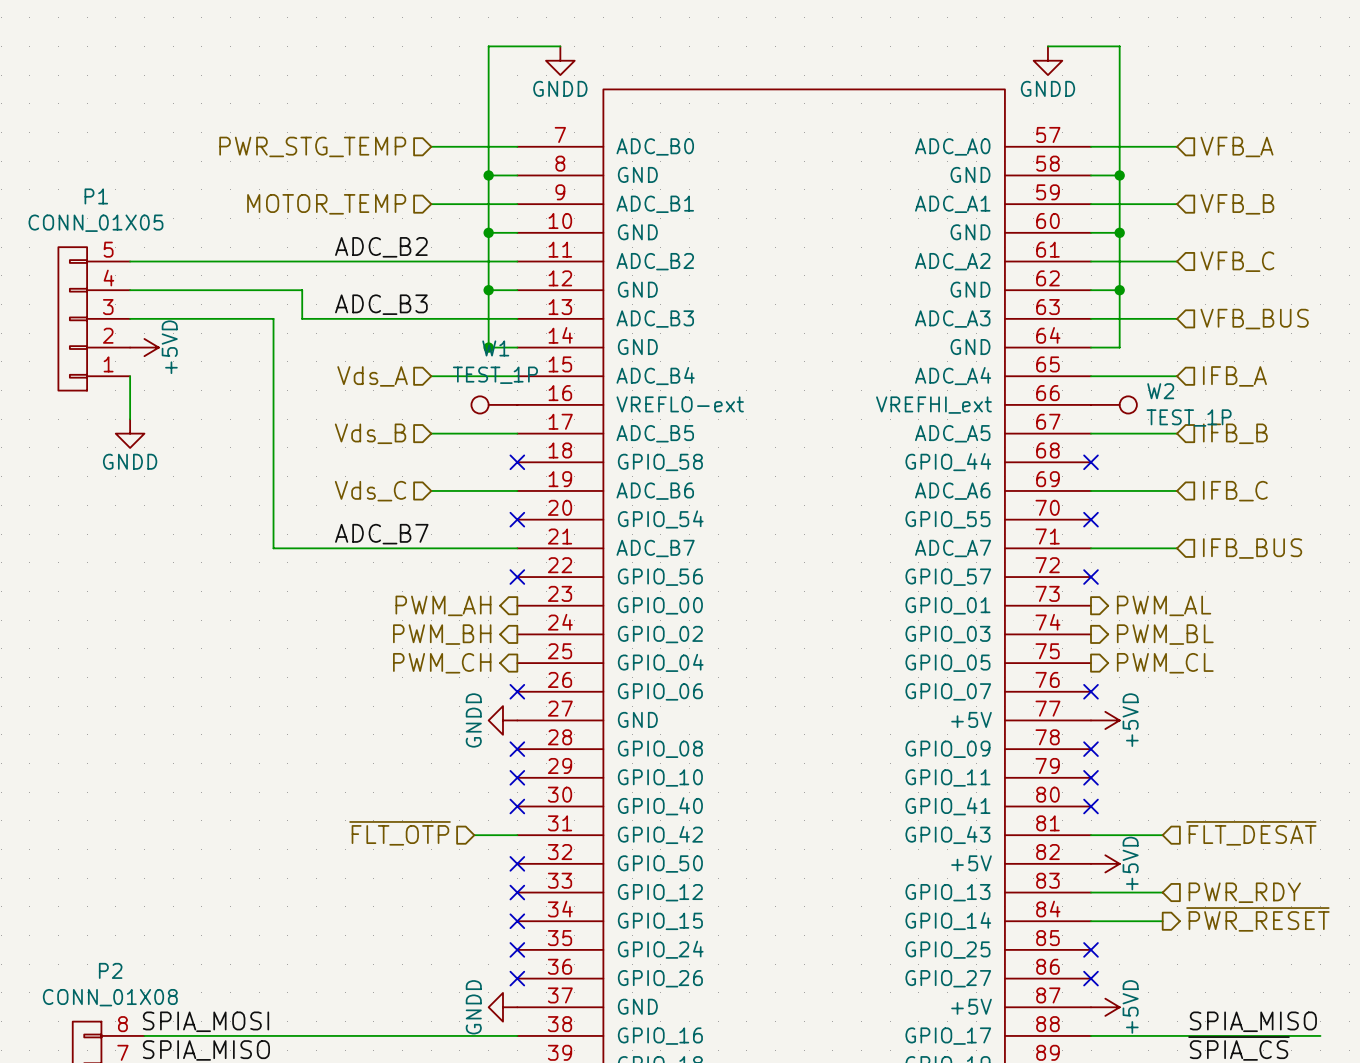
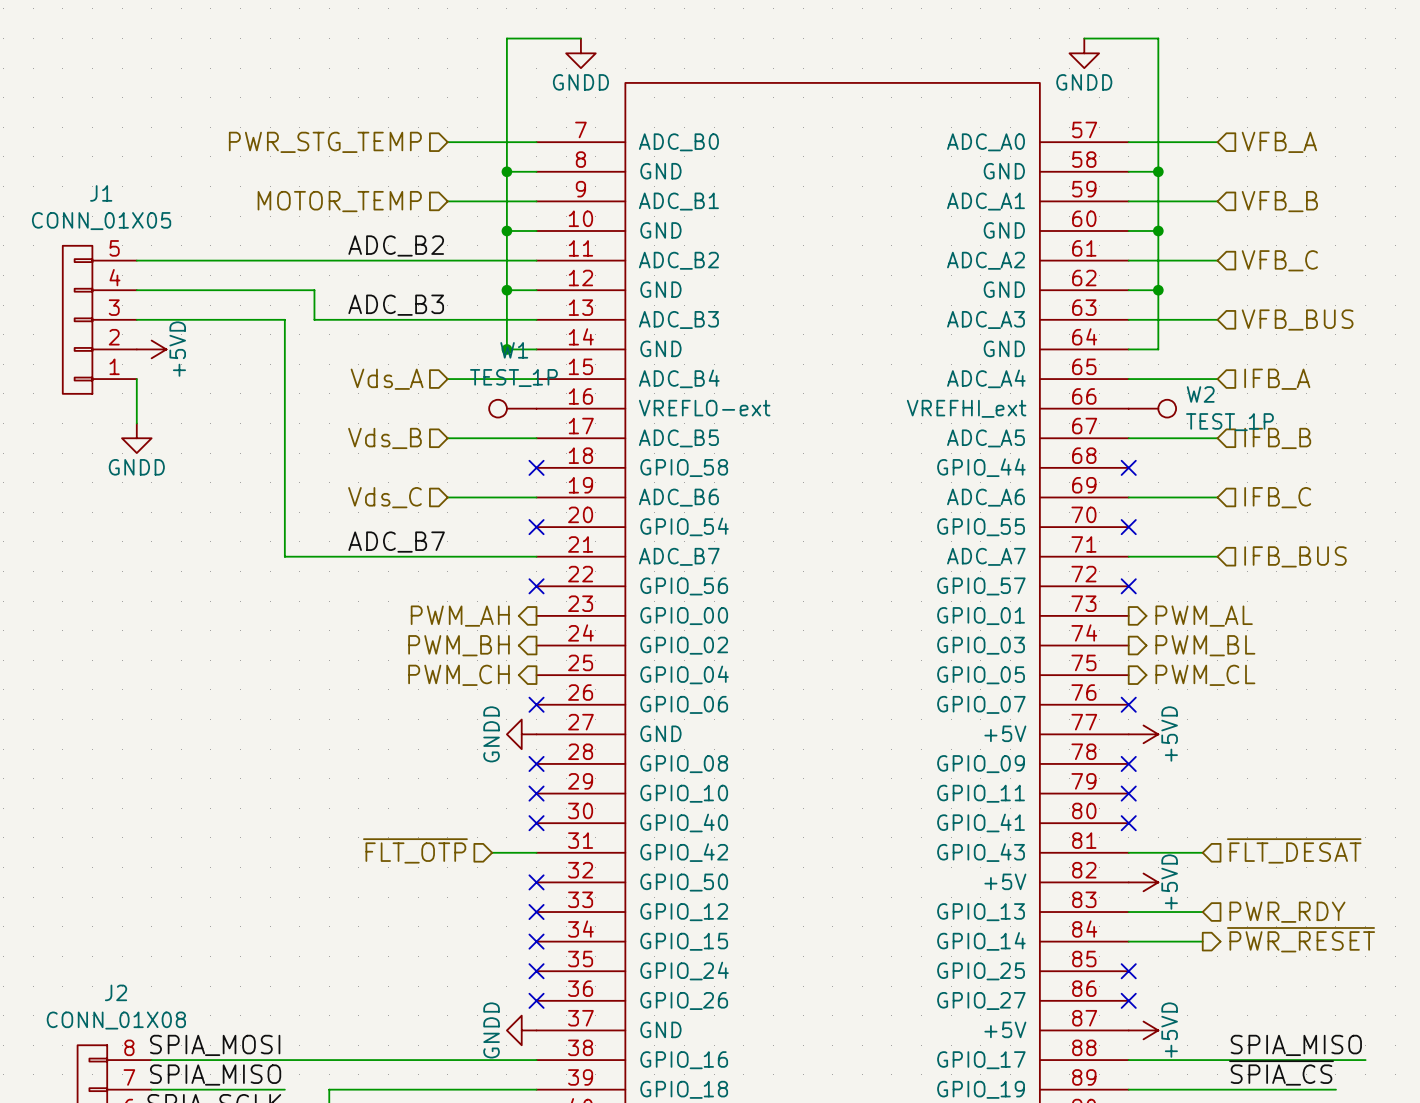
P1 name: P1 (96, 196) -> J1 (101, 193)
P2 name: P2 (110, 970) -> J2 (116, 992)

